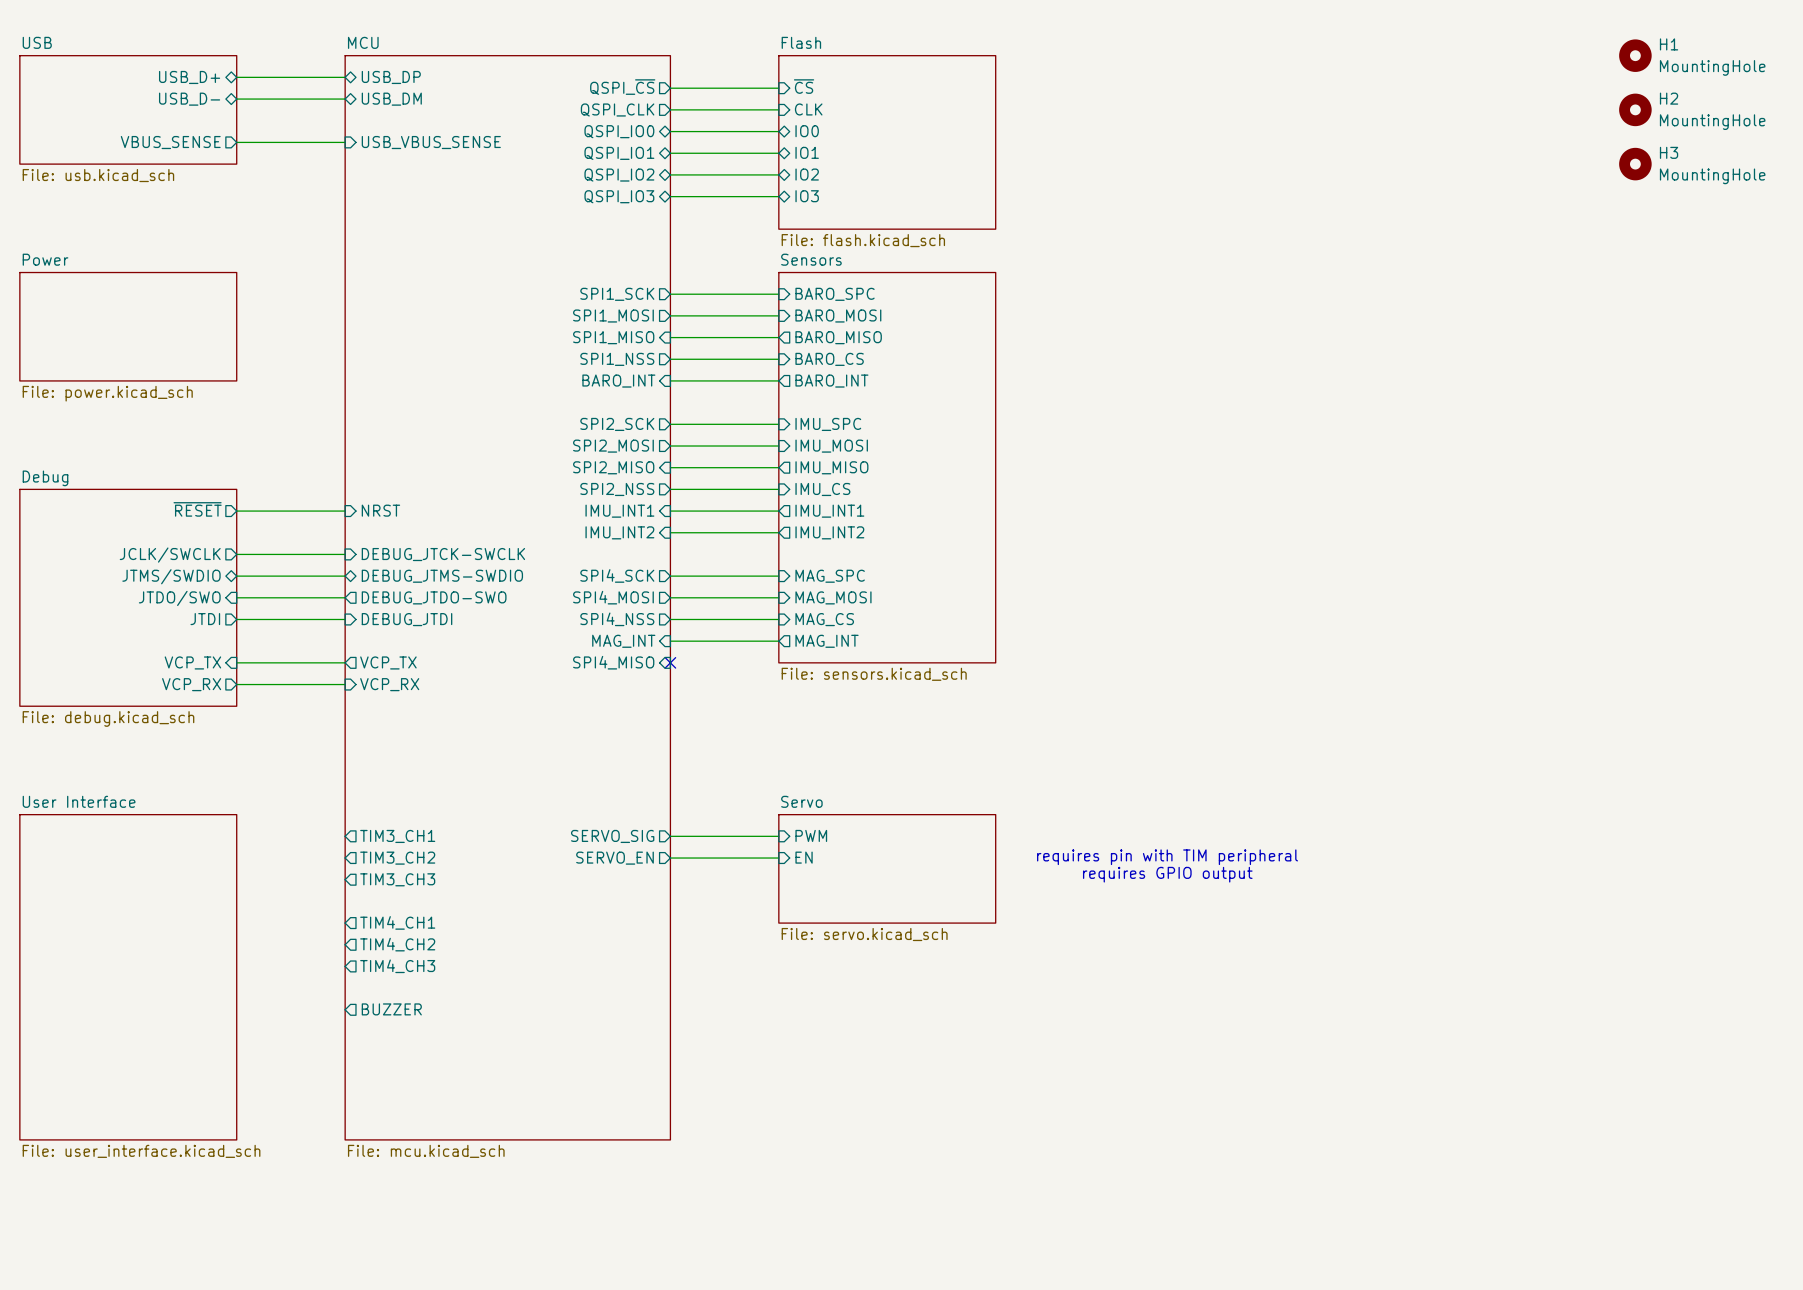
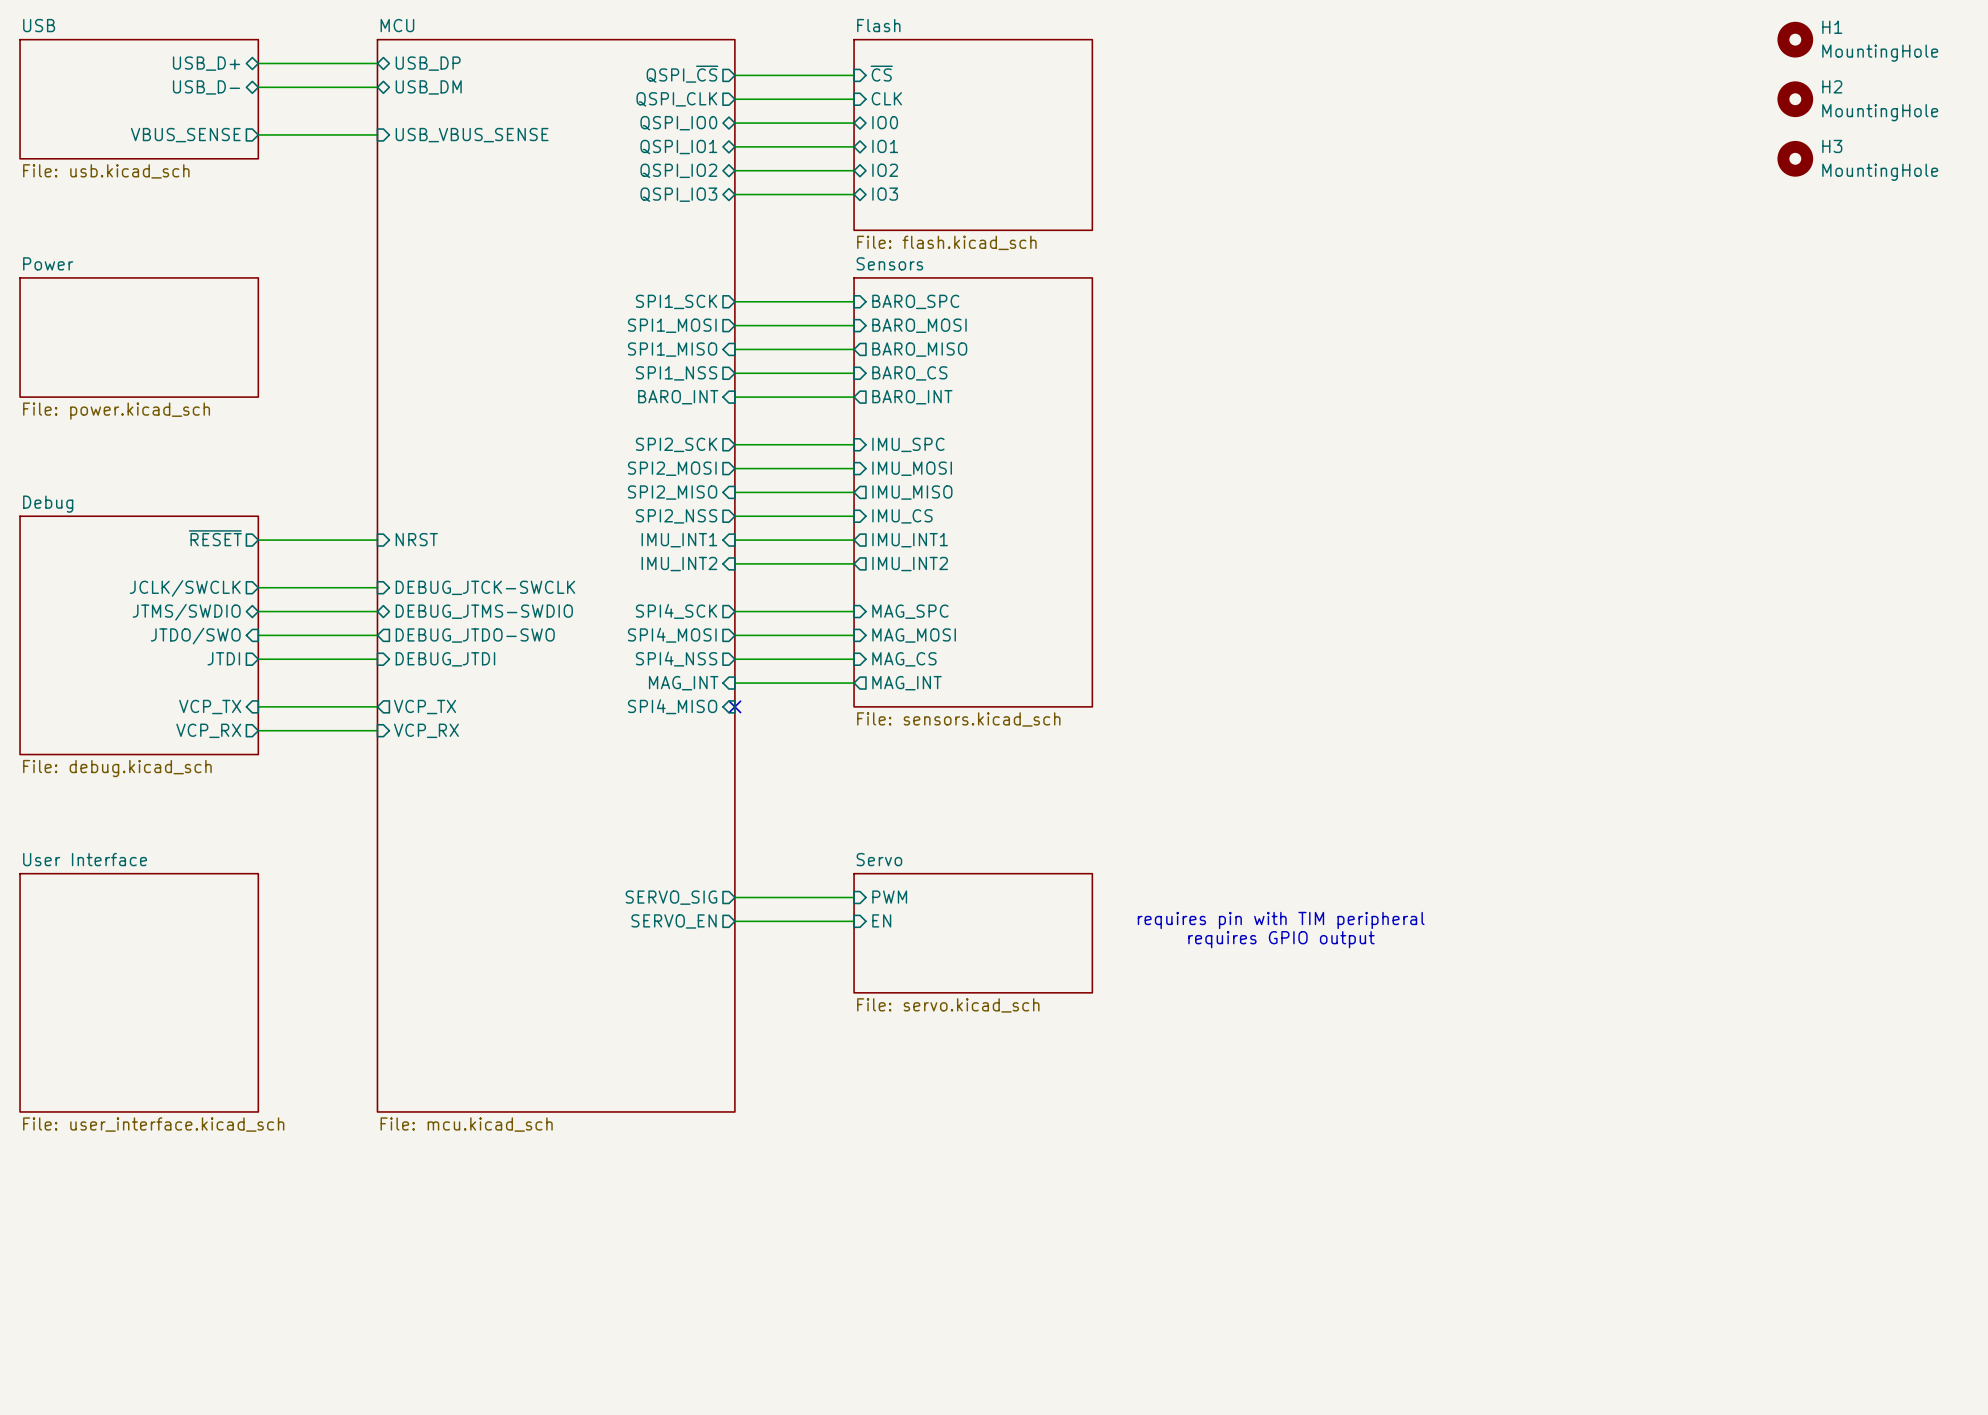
sheet MCU: none -> File: mcu.kicad_sch (556, 575)
sheet MCU: File: mcu.kicad_sch (507, 597) -> none
sheet pin: TIM3_CH1 (397, 836) -> none
sheet pin: TIM3_CH2 (397, 858) -> none
sheet pin: TIM3_CH3 (397, 879) -> none
sheet pin: TIM4_CH1 (397, 922) -> none
sheet User Interface: none -> File: user_interface.kicad_sch (139, 992)
sheet pin: TIM4_CH2 (397, 944) -> none
sheet pin: TIM4_CH3 (397, 966) -> none
sheet User Interface: File: user_interface.kicad_sch (128, 977) -> none
sheet pin: BUZZER (391, 1009) -> none

